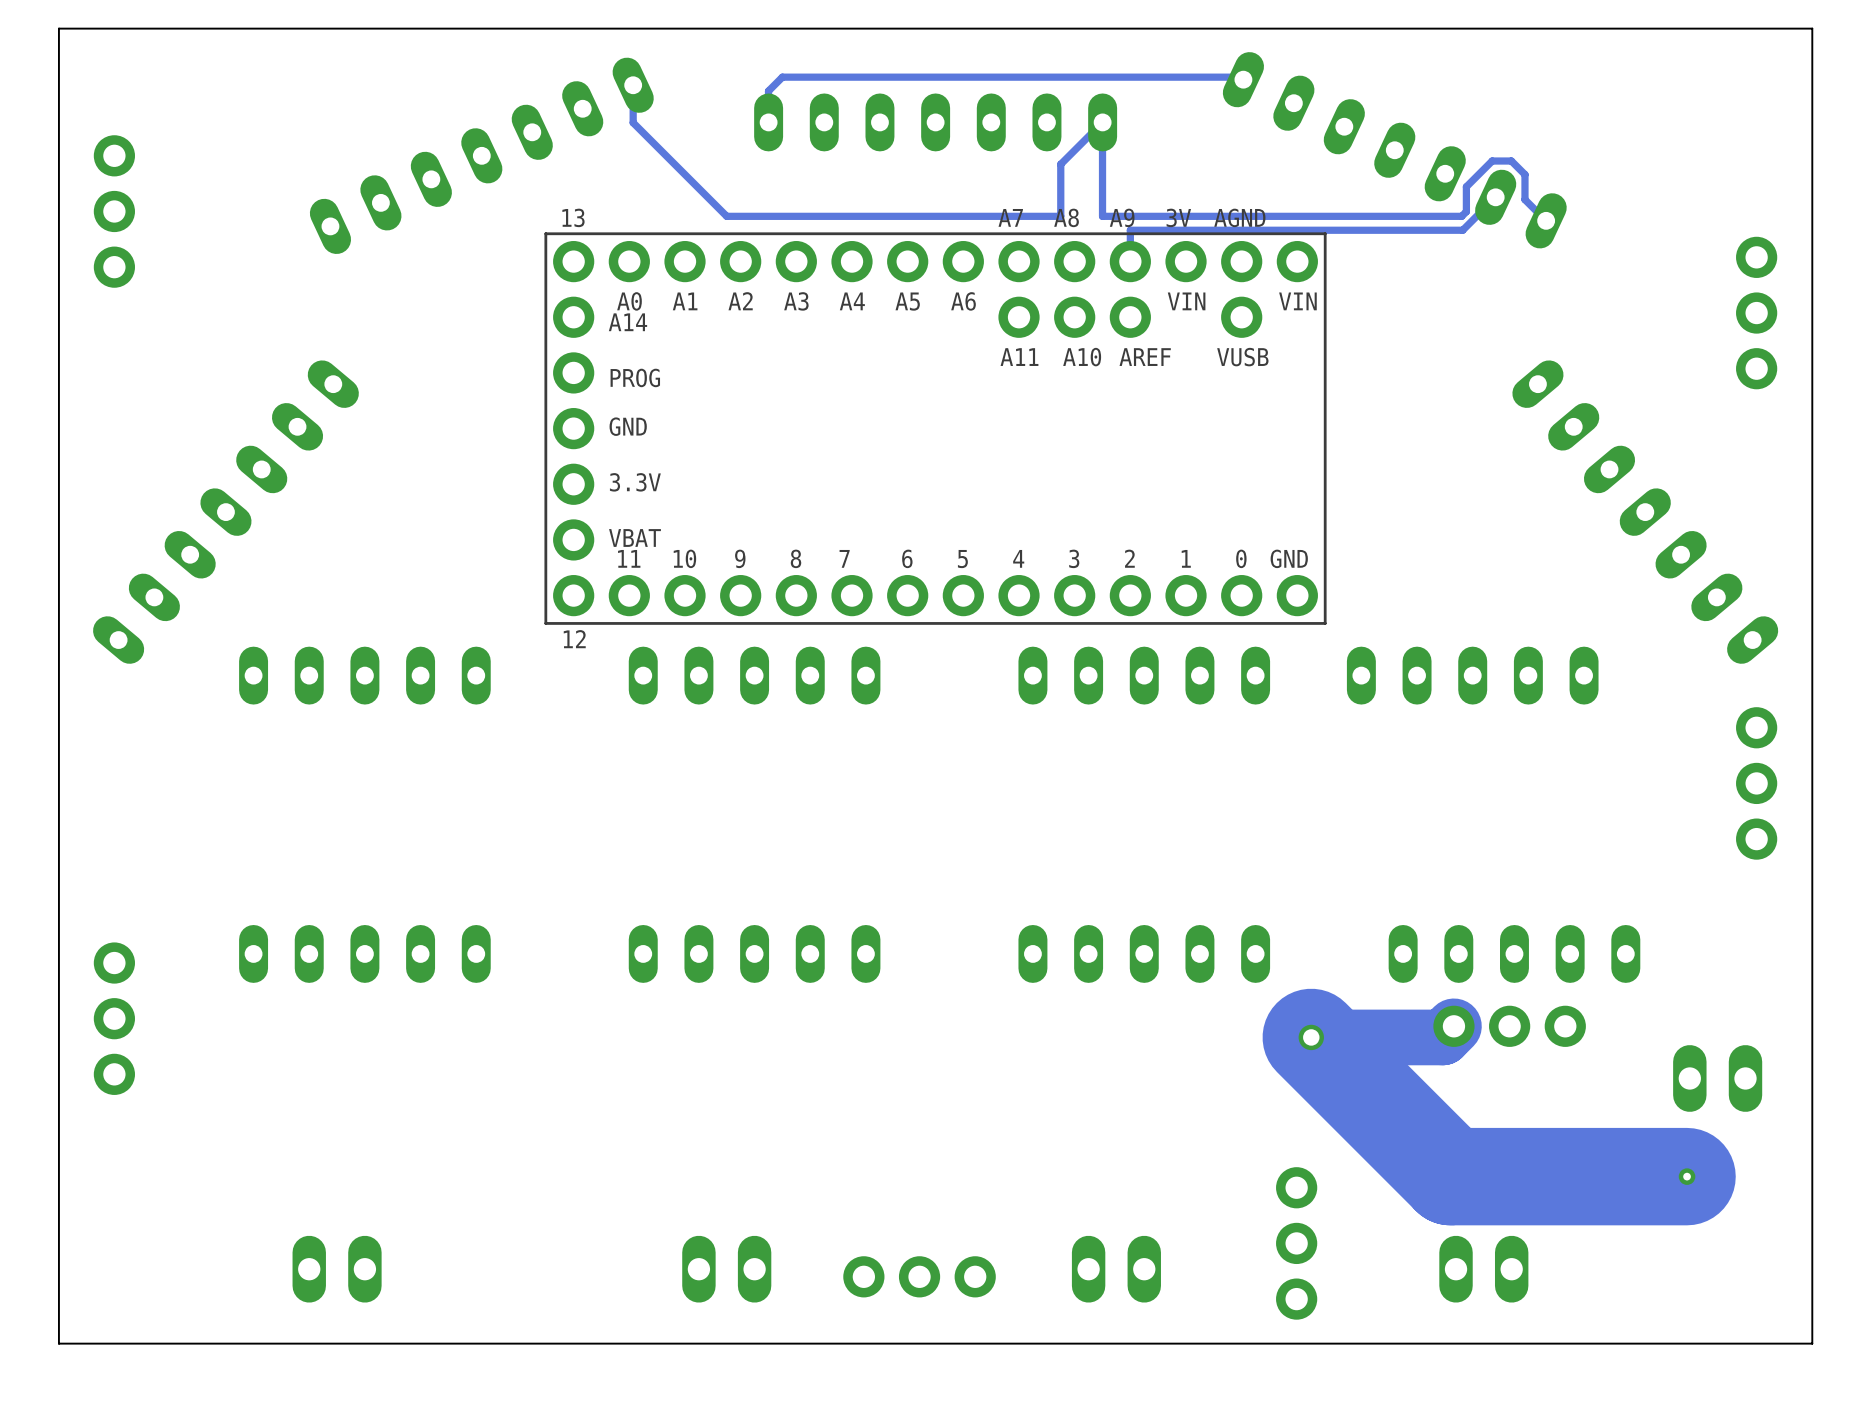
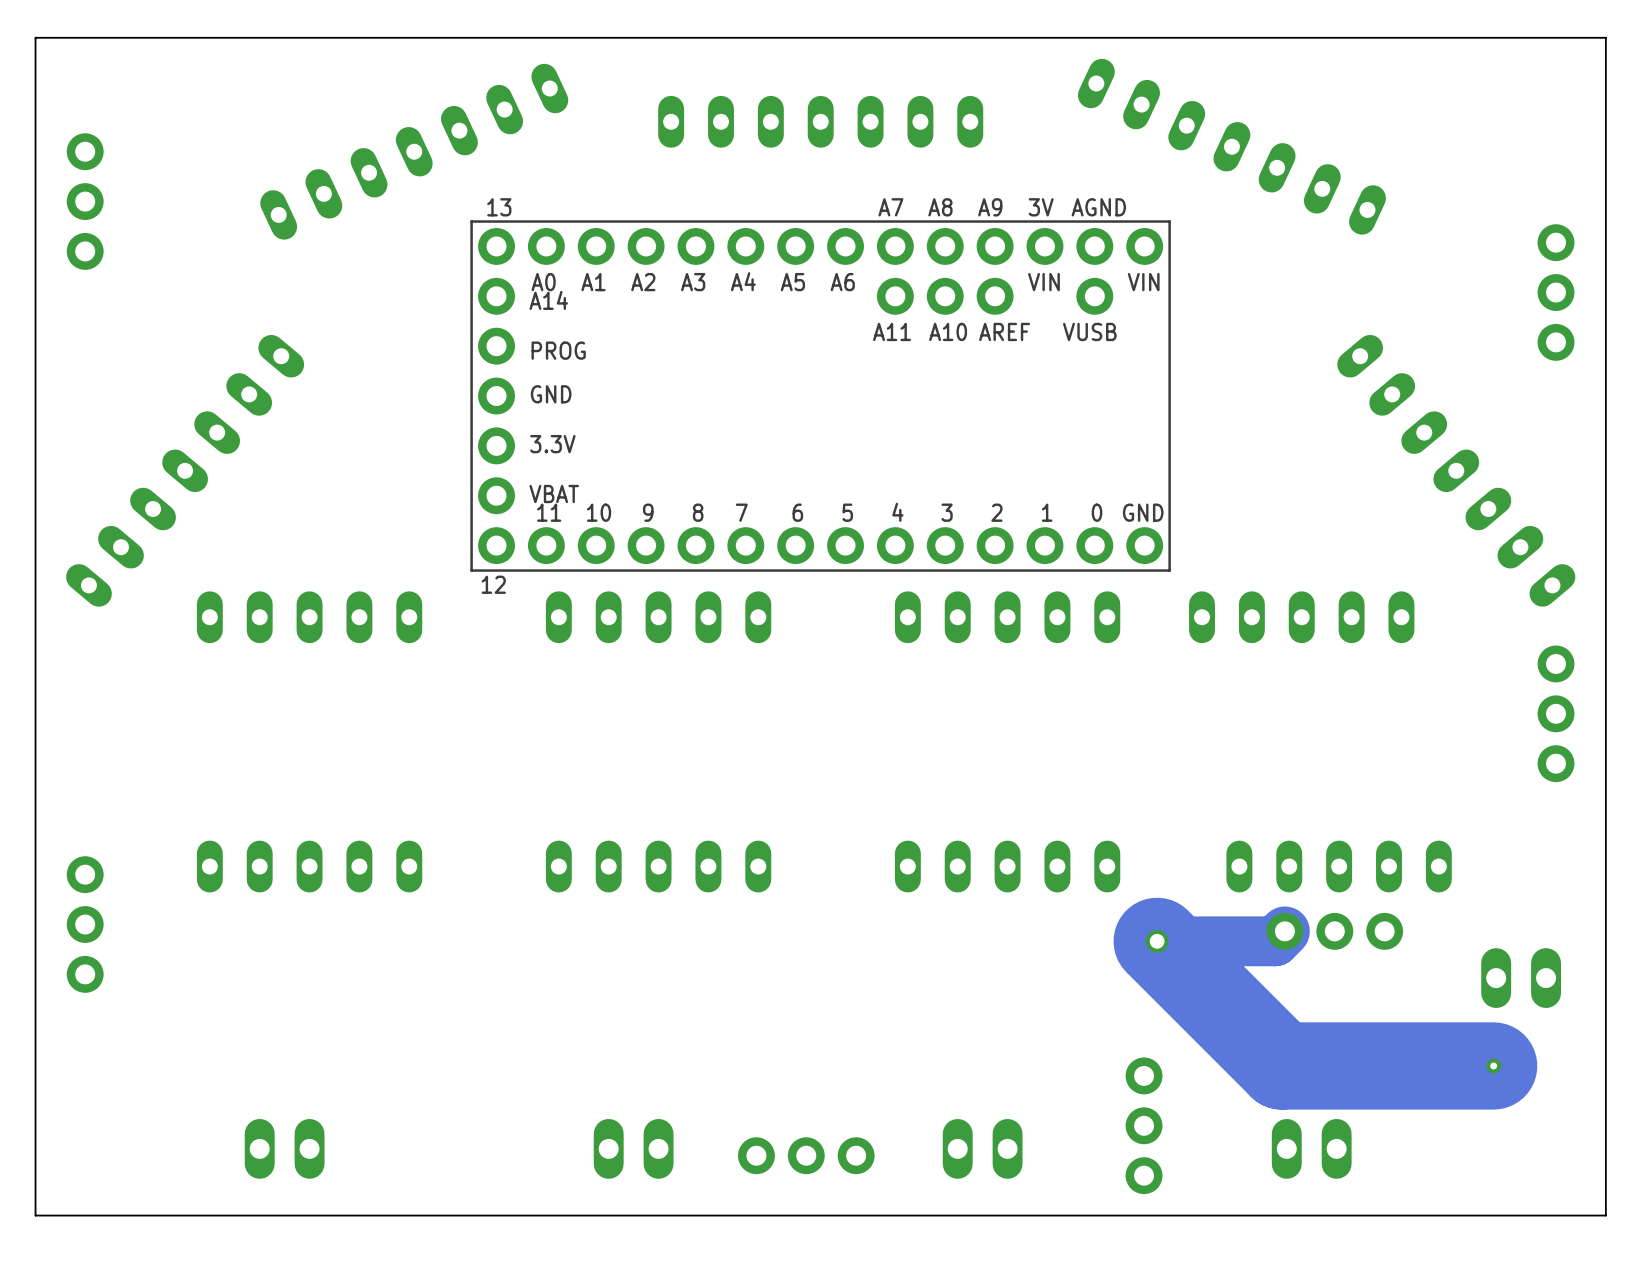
track: (1243, 79) (1240, 77) (782, 77) (768, 91) (768, 122) -> none
track: (633, 85) (633, 122) (726, 216) (1060, 216) (1060, 164) (1102, 122) -> none
track: (1102, 122) (1102, 216) (1461, 216) (1466, 211) (1466, 186) (1492, 161) (1511, 161) (1524, 174) (1524, 199) (1546, 220) -> none
track: (1495, 197) (1462, 230) (1130, 230) (1130, 261) -> none

